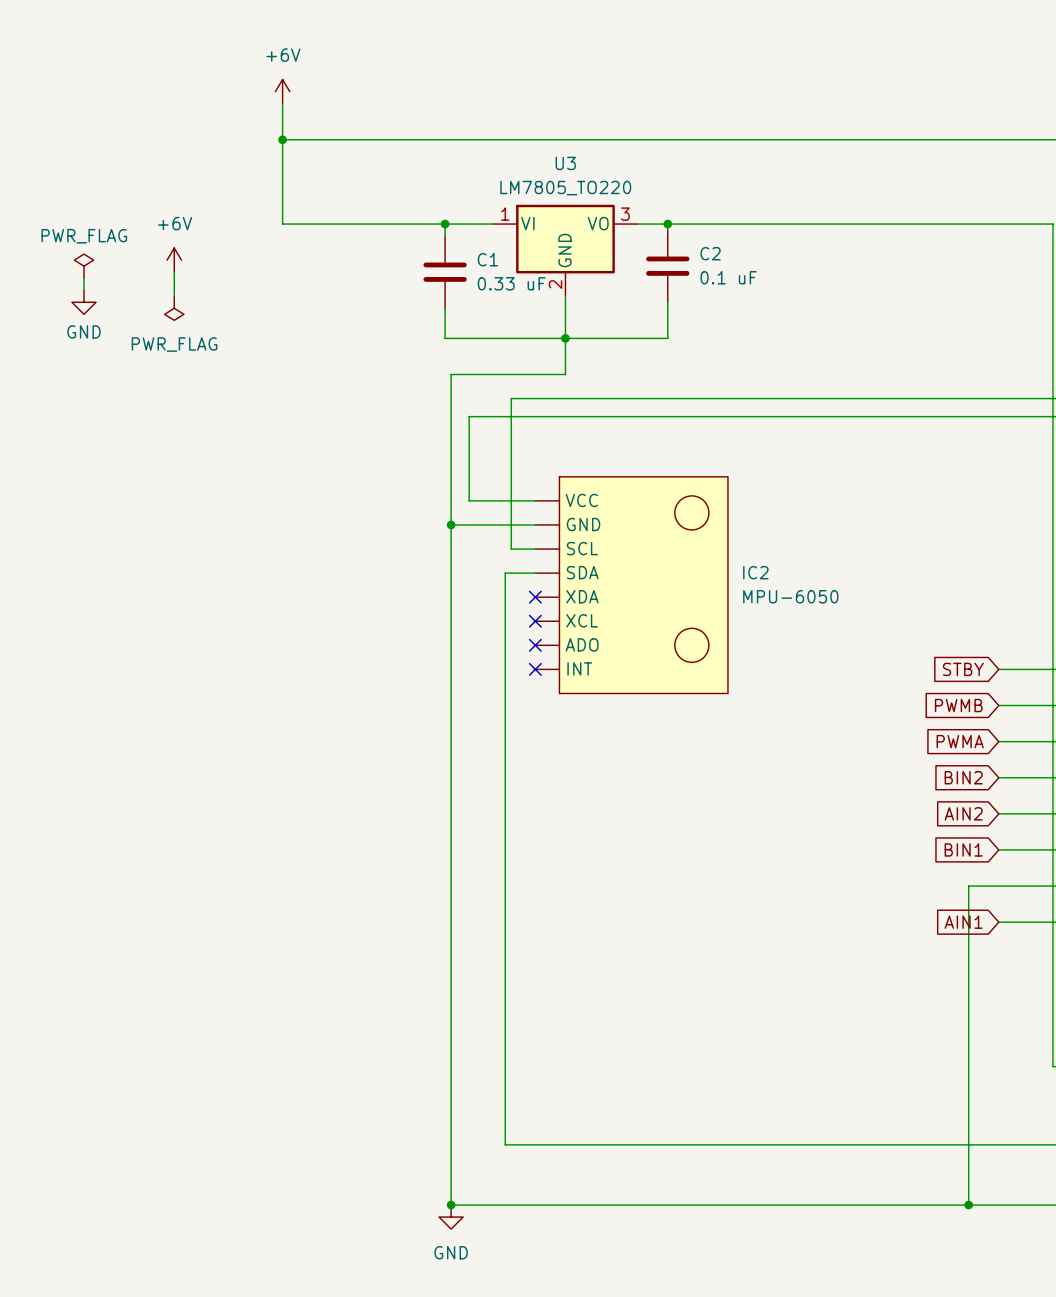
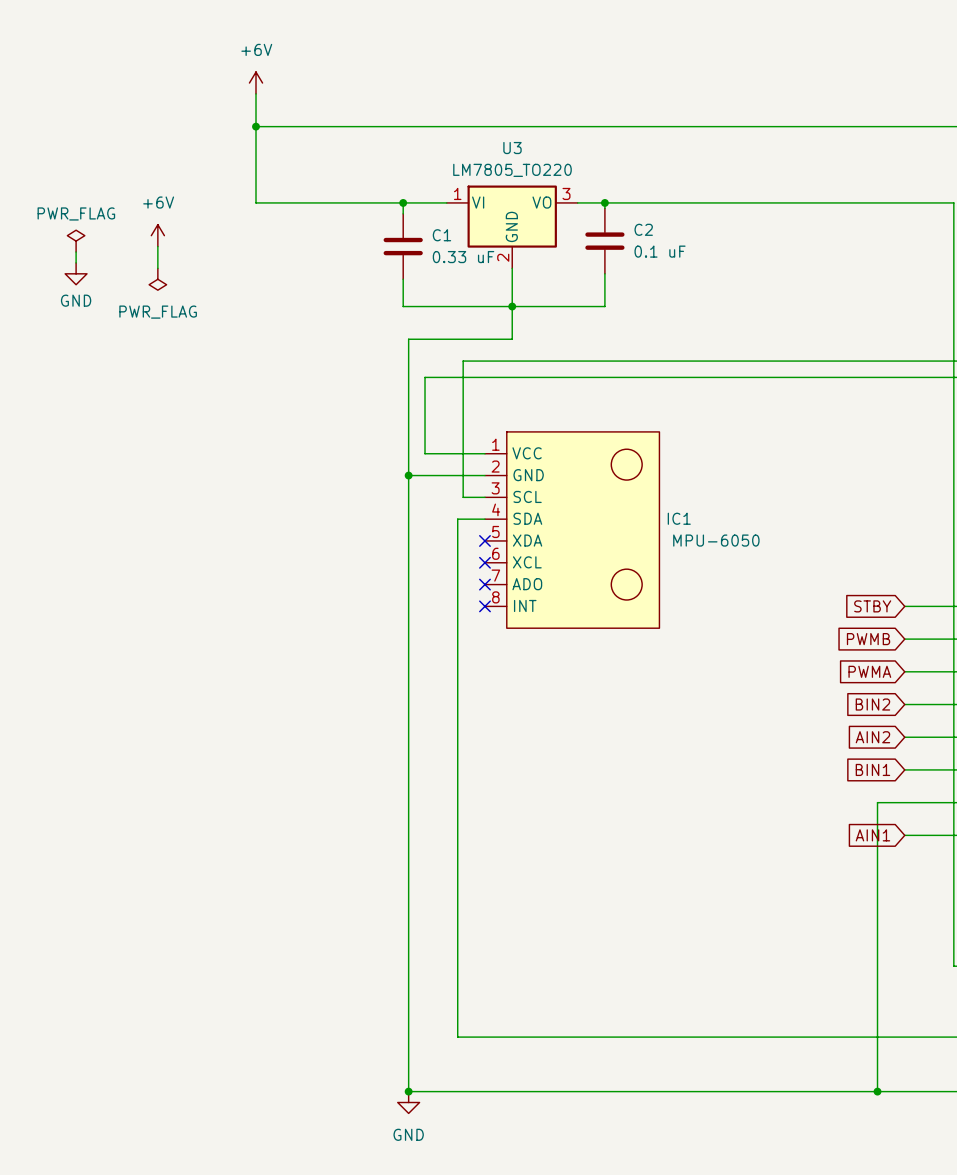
IC2 pin number: none -> 1 (495, 444)
IC2 pin number: none -> 2 (495, 466)
IC2 pin number: none -> 3 (495, 488)
IC2 pin number: none -> 4 (496, 509)
IC2 name: IC2 (755, 572) -> IC1 (679, 518)
IC2 pin number: none -> 5 (495, 531)
IC2 pin number: none -> 6 (495, 553)
IC2 pin number: none -> 7 (495, 575)
IC2 pin number: none -> 8 (495, 597)

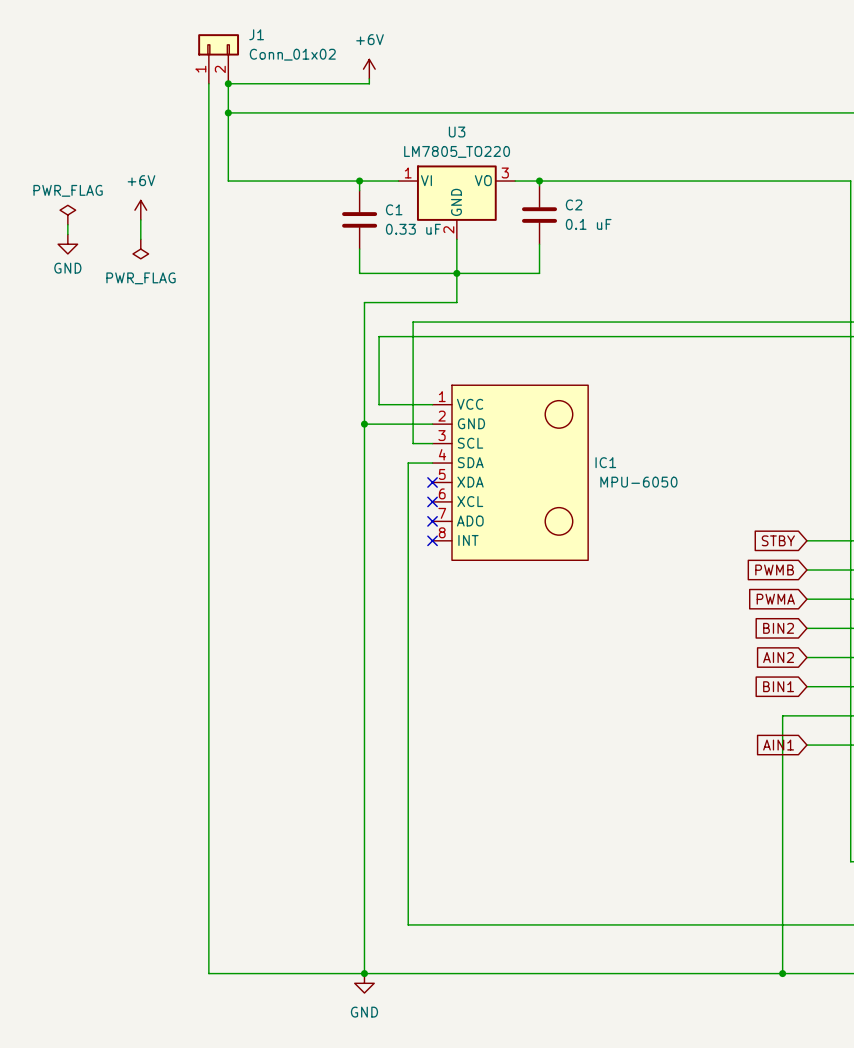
J1: none -> Conn_01x02 (218, 58)
power symbol position: +6V (256, 83) -> +6V (369, 69)
wire: none -> (369, 78) (369, 83) (228, 83)
wire: none -> (208, 83) (208, 973) (364, 973)
junction: none -> (228, 83)

